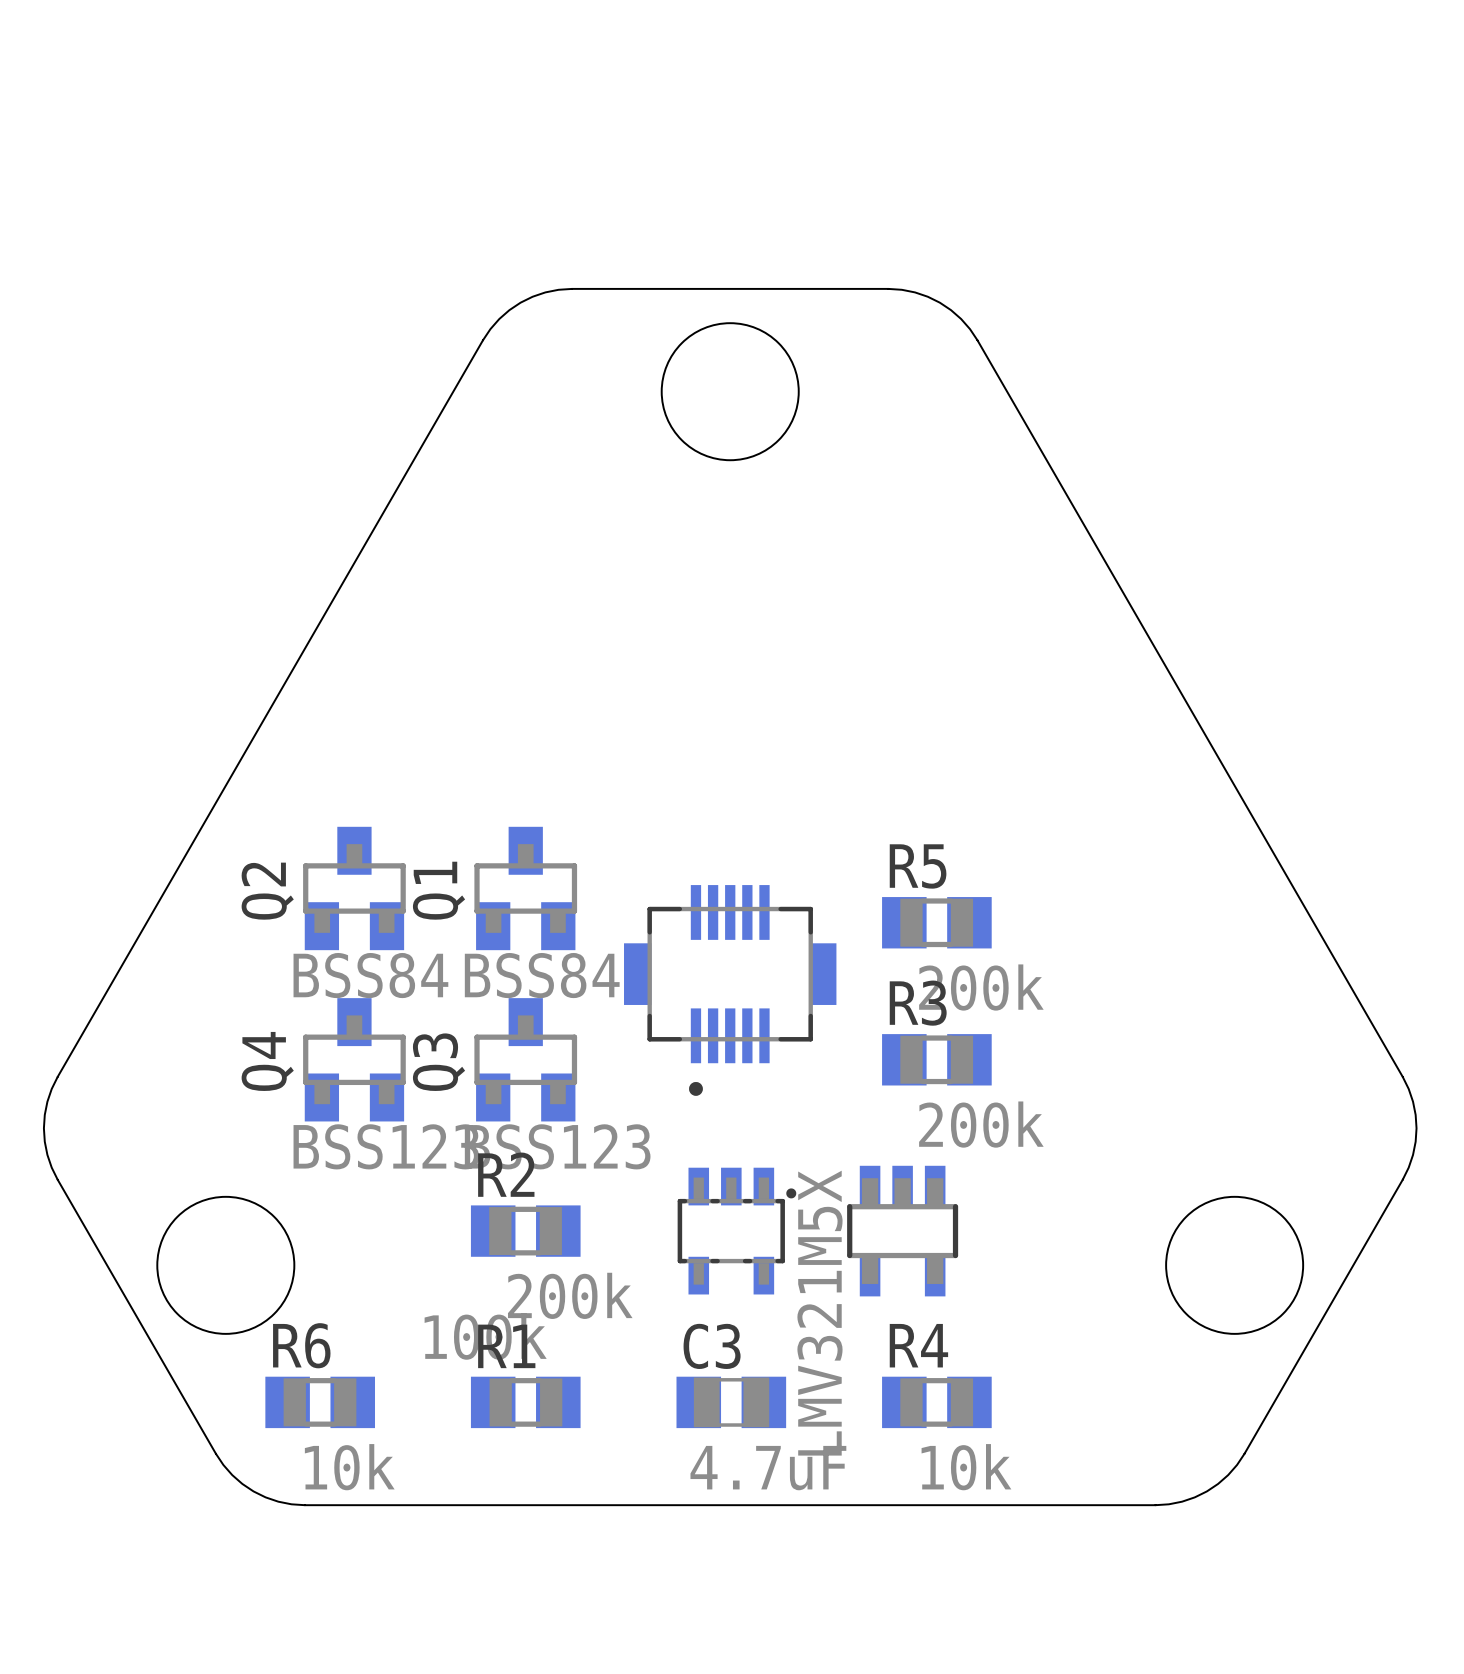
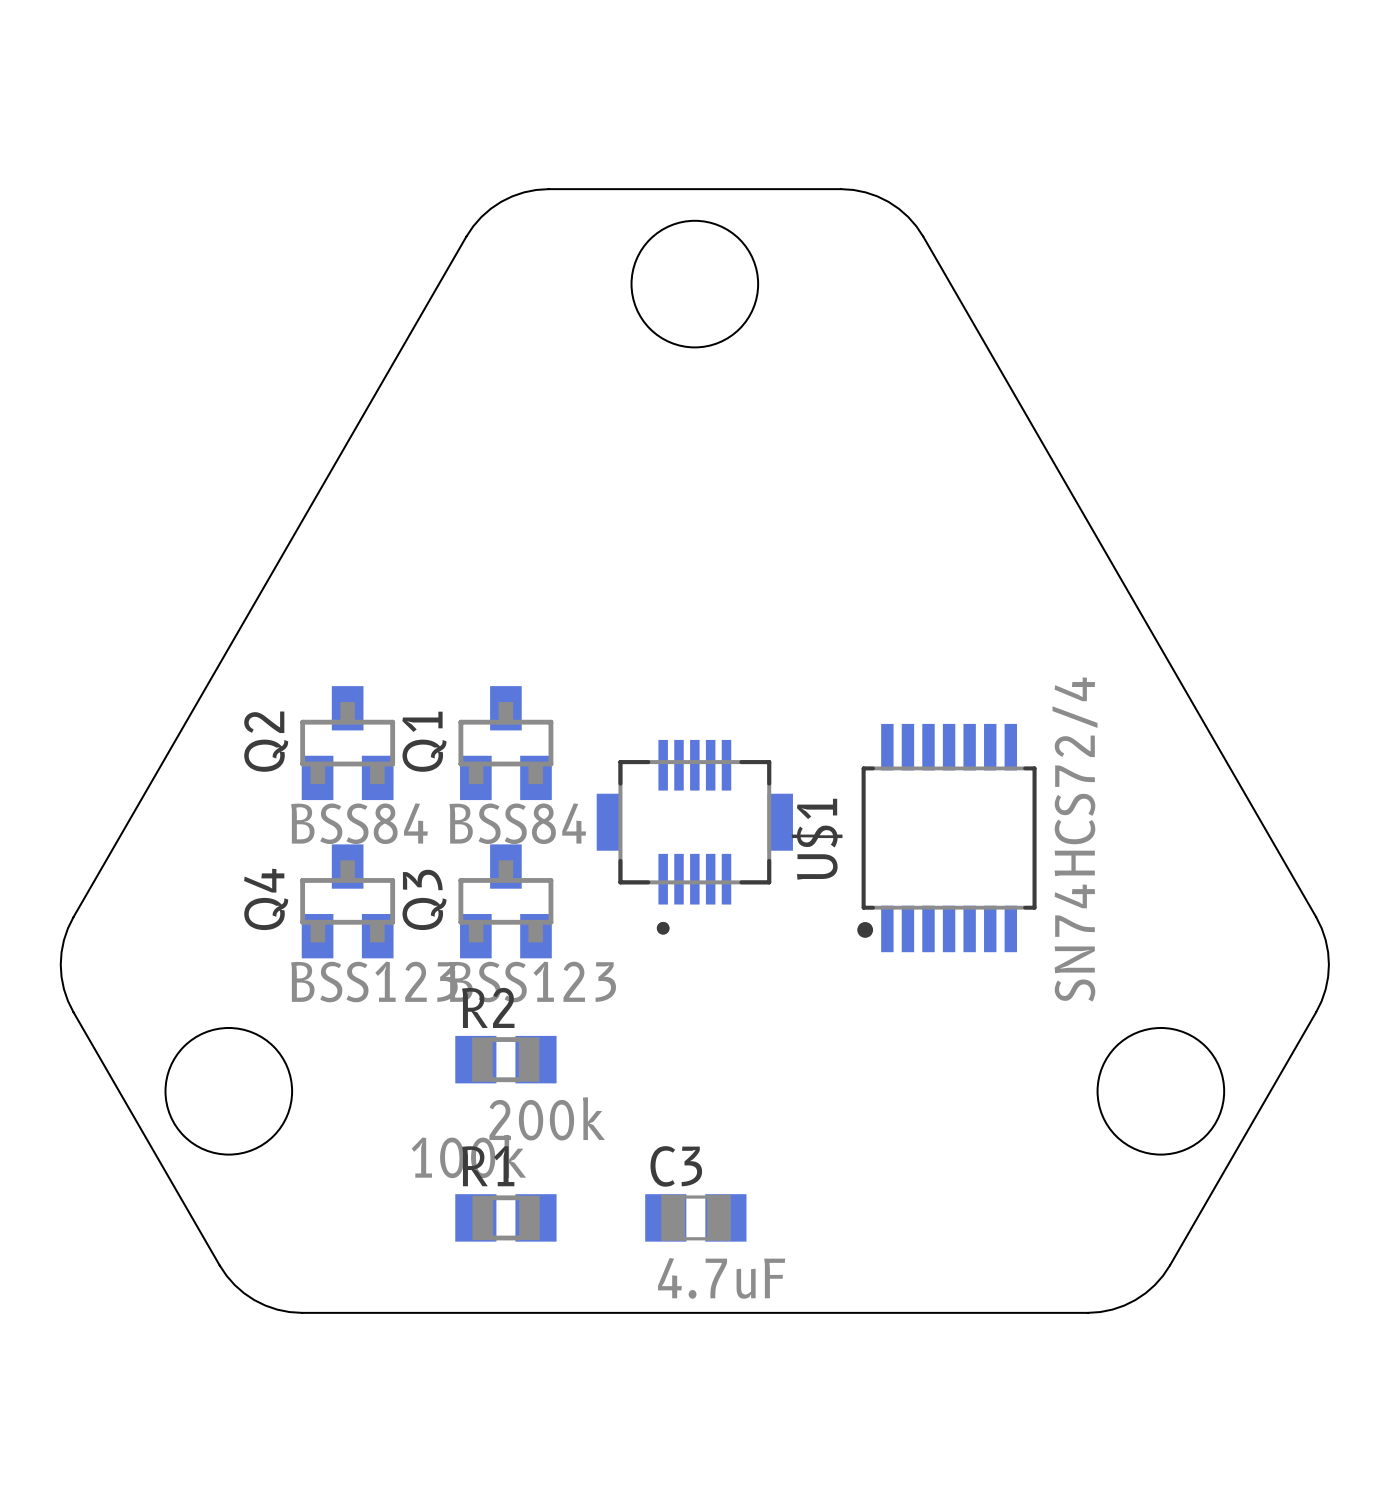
R5: 200k (936, 922) -> none
U$1: none -> SN74HCS72/4 (946, 838)
R3: 200k (936, 1059) -> none
part: (737, 1231) -> none
part: LMV321M5X (902, 1231) -> none
R6: 10k (320, 1402) -> none
R4: 10k (936, 1402) -> none

